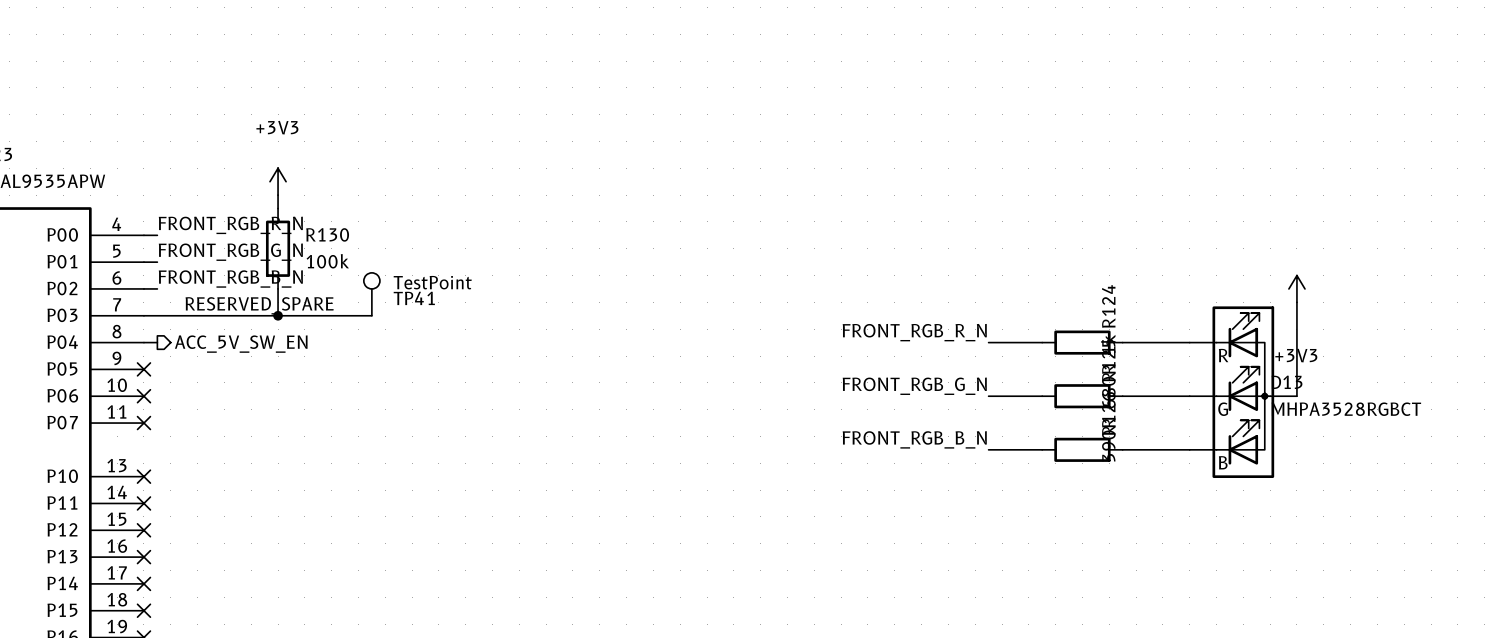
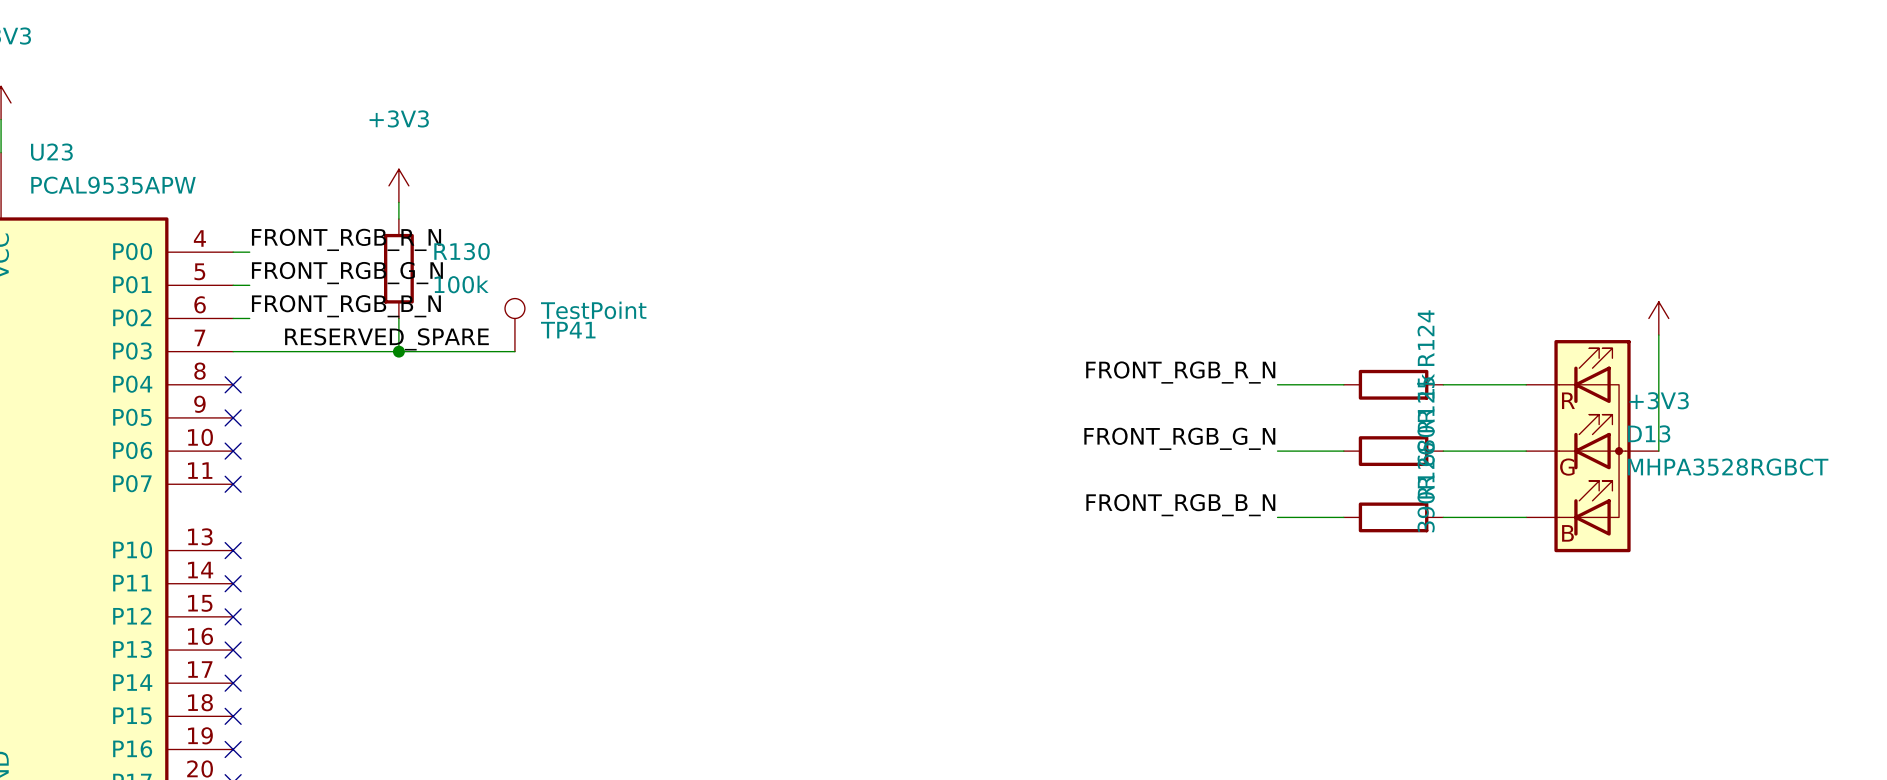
wire: (143, 342) (157, 342) -> none
no-connect mark: none -> (233, 384)
hierarchical label: ACC_5V_SW_EN (241, 344) -> none

